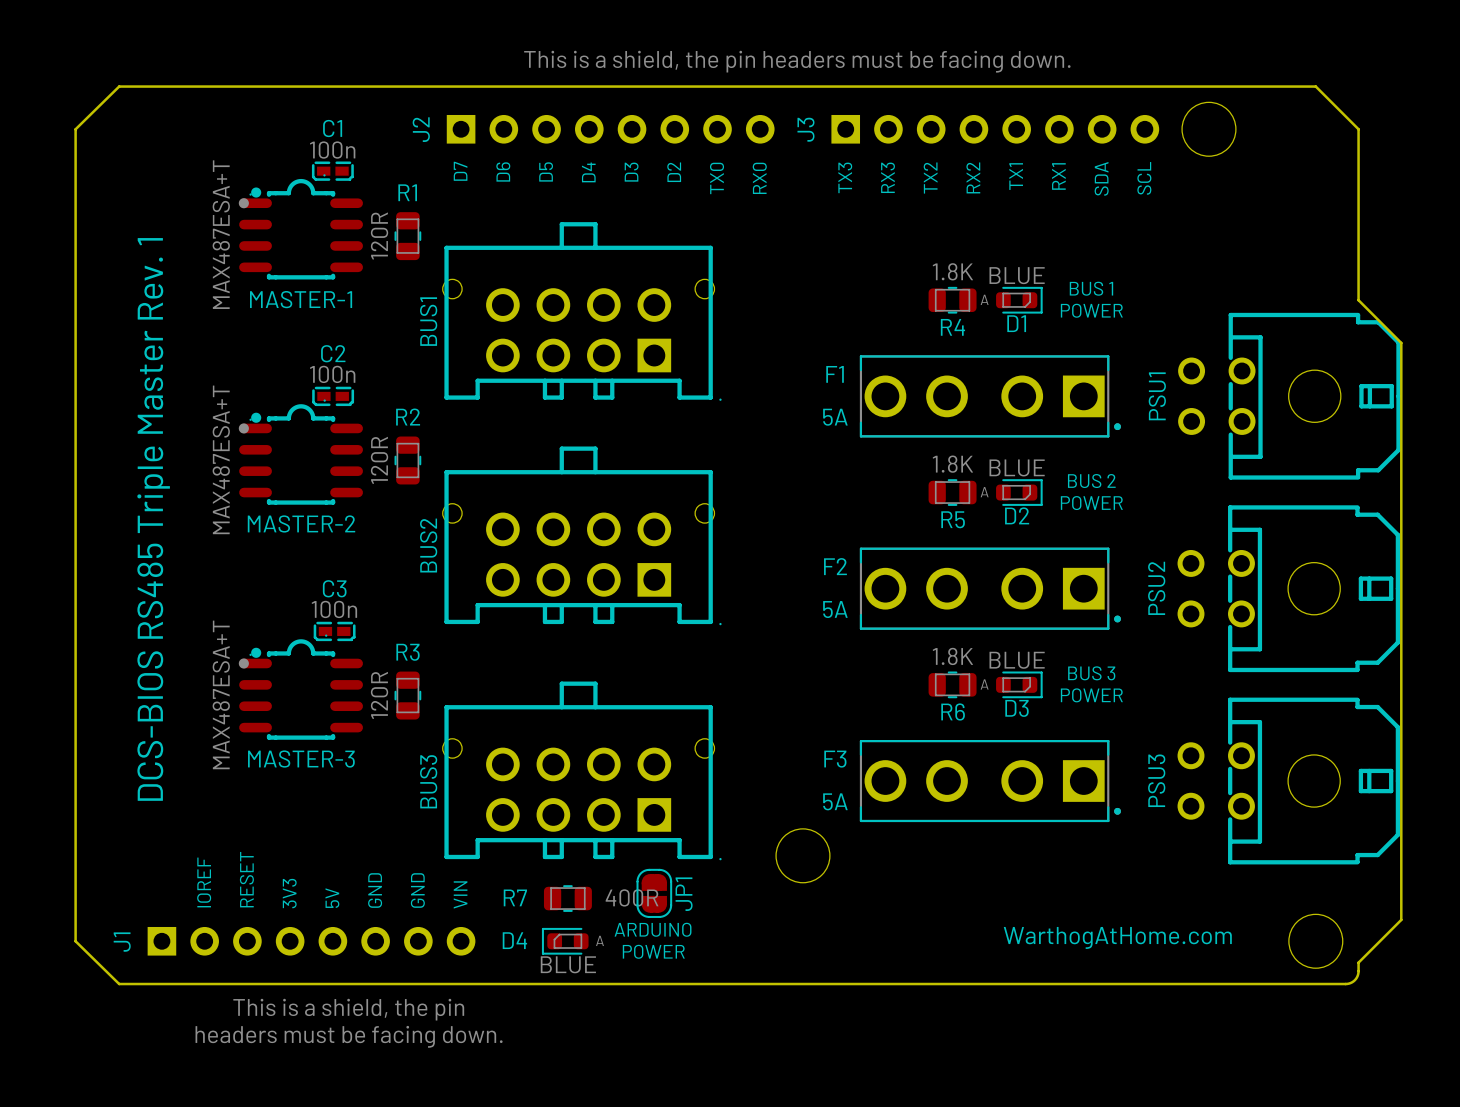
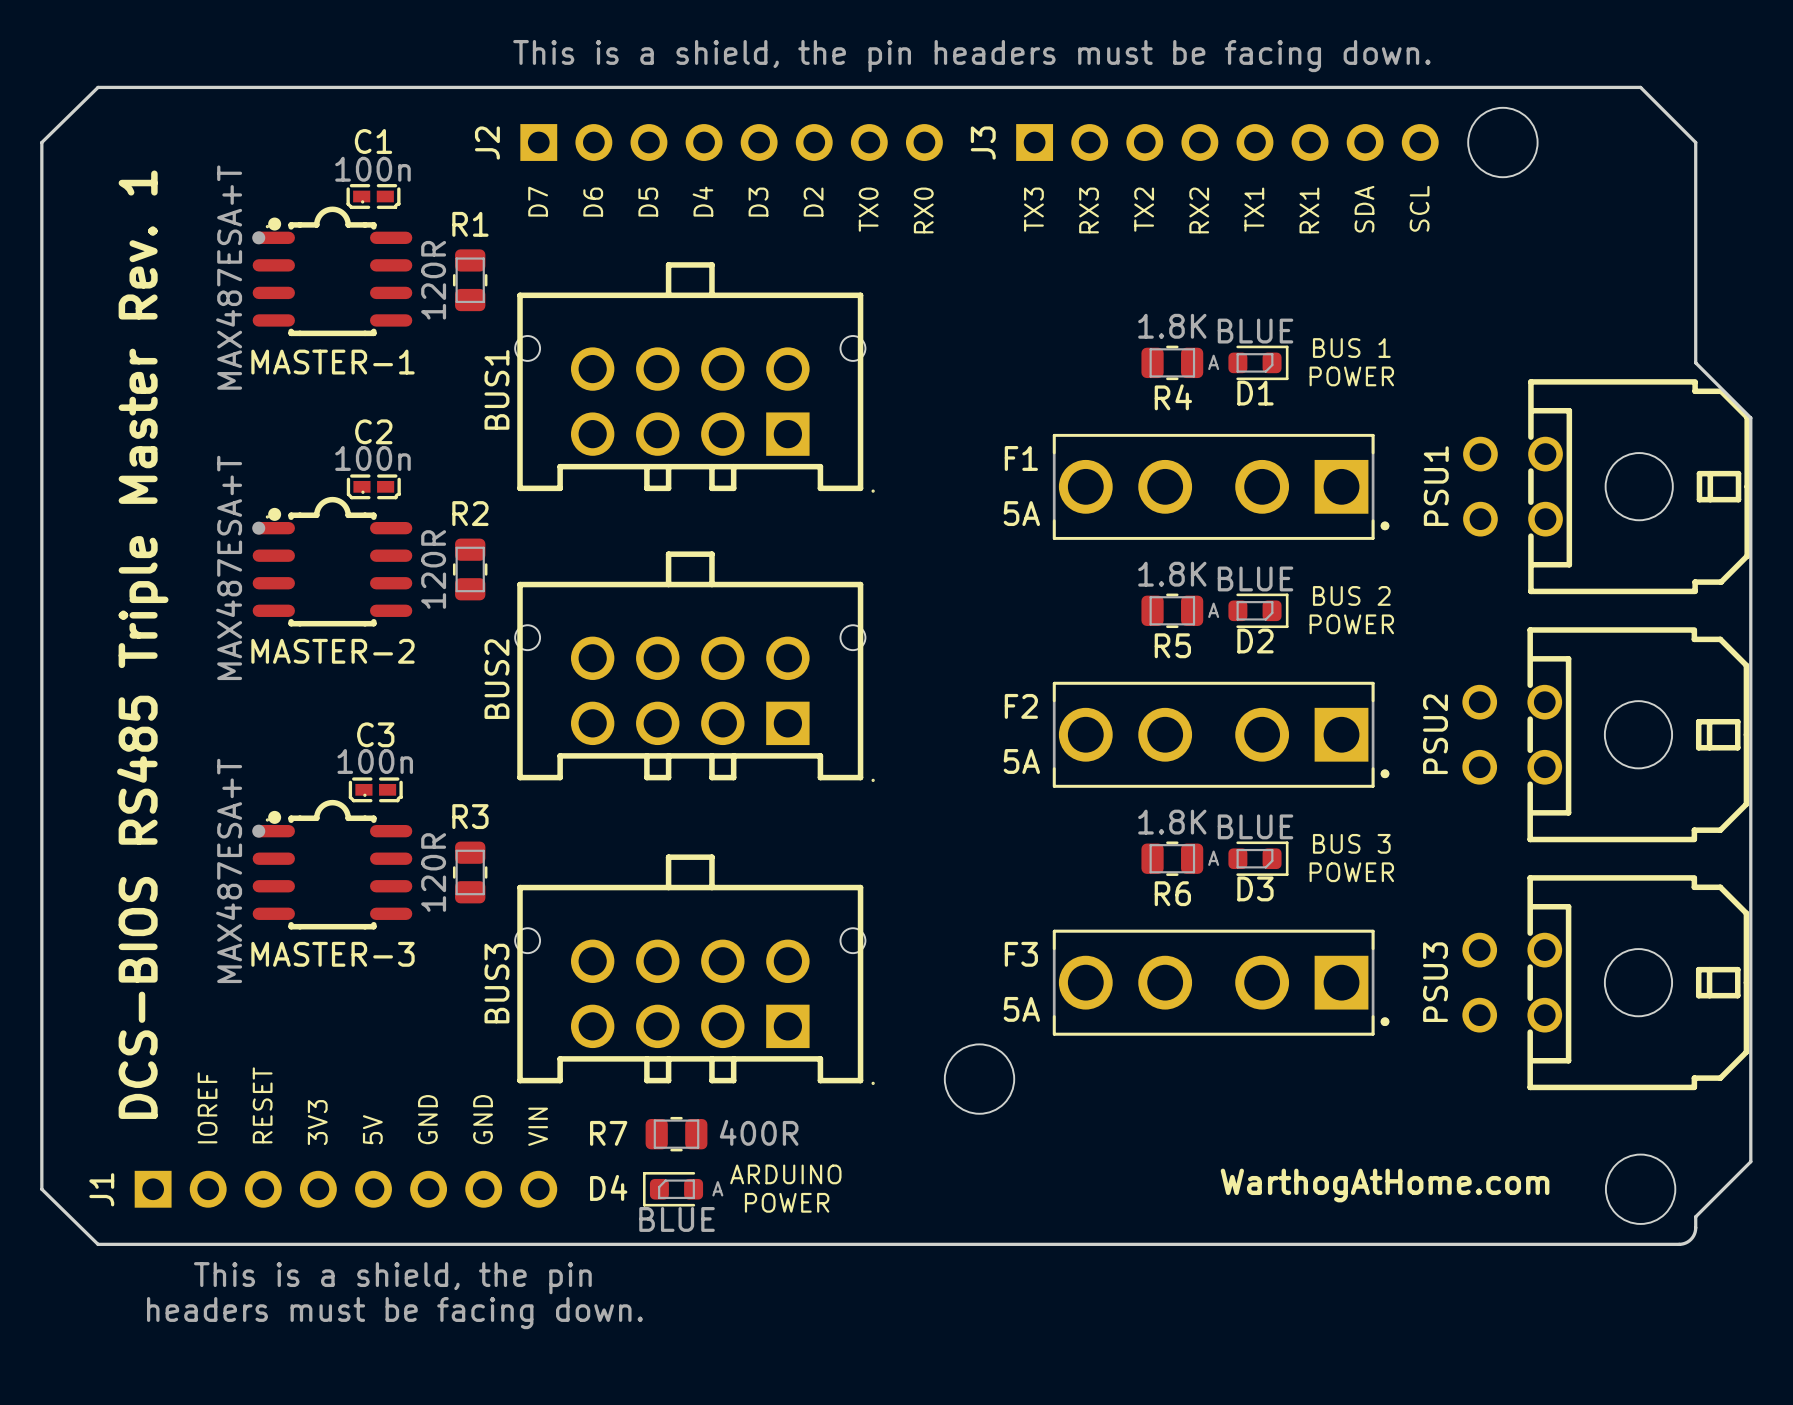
JP1: (654, 893) -> none

